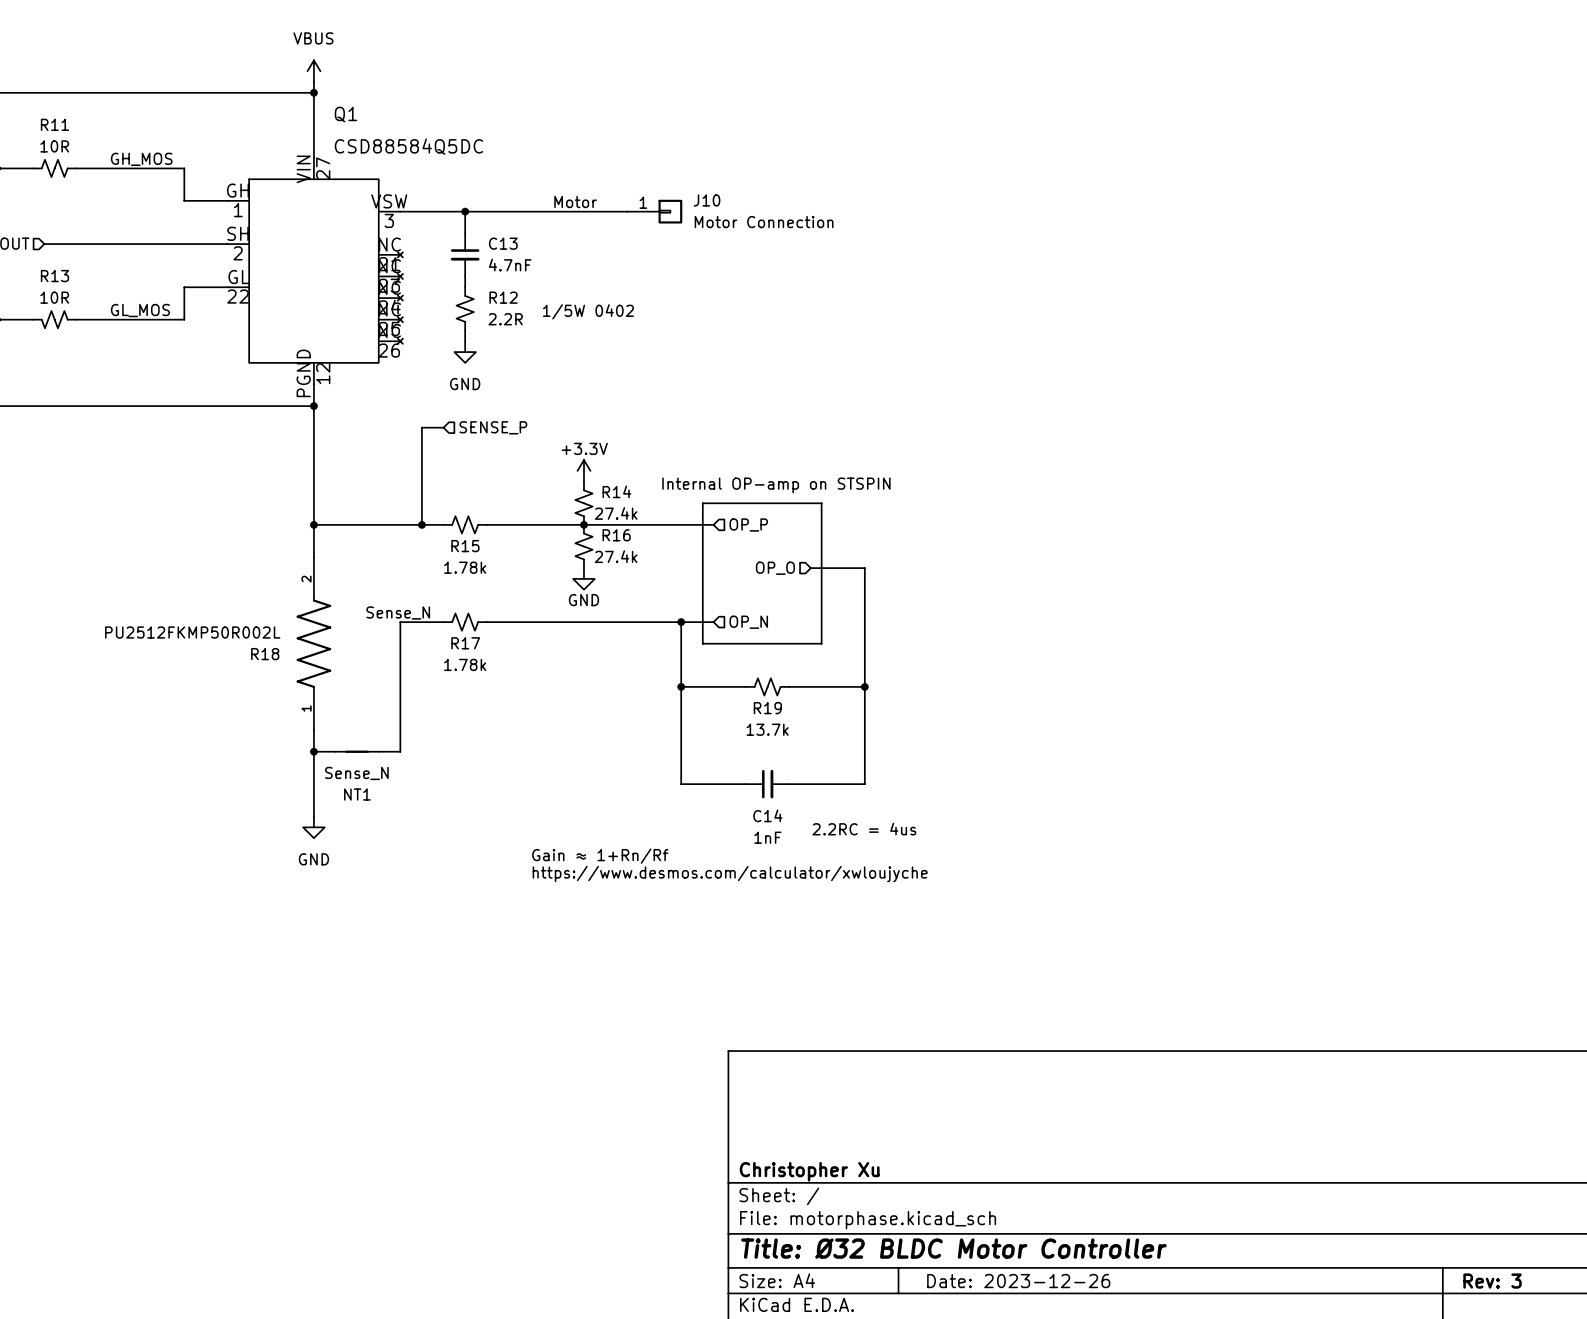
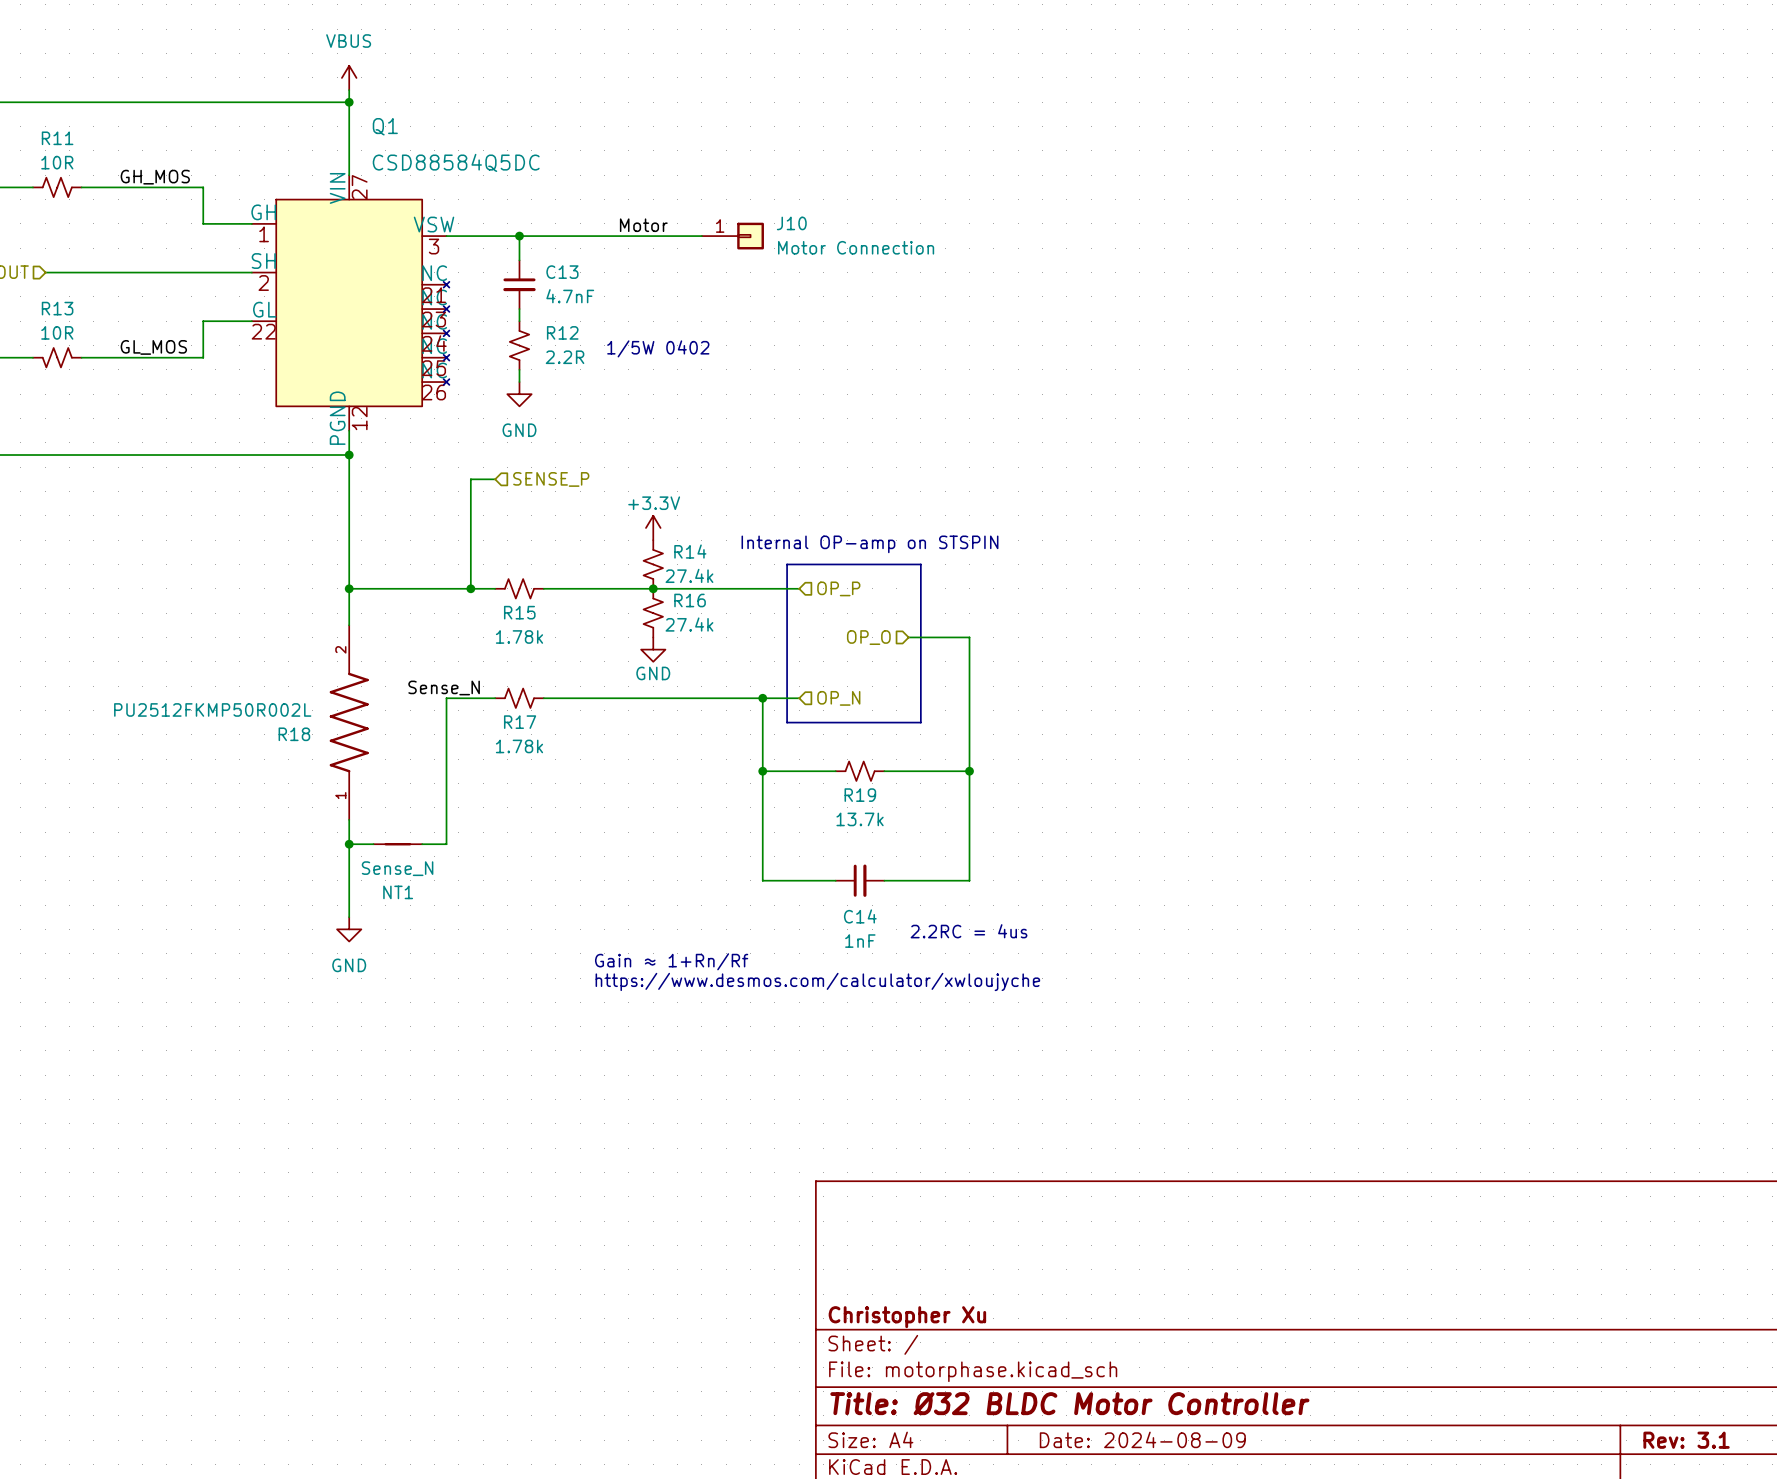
title block: Date: 2023-12-26 (1018, 1281) -> Date: 2024-08-09 (1142, 1439)
title block: Rev: 3 (1492, 1281) -> Rev: 3.1 (1686, 1440)

